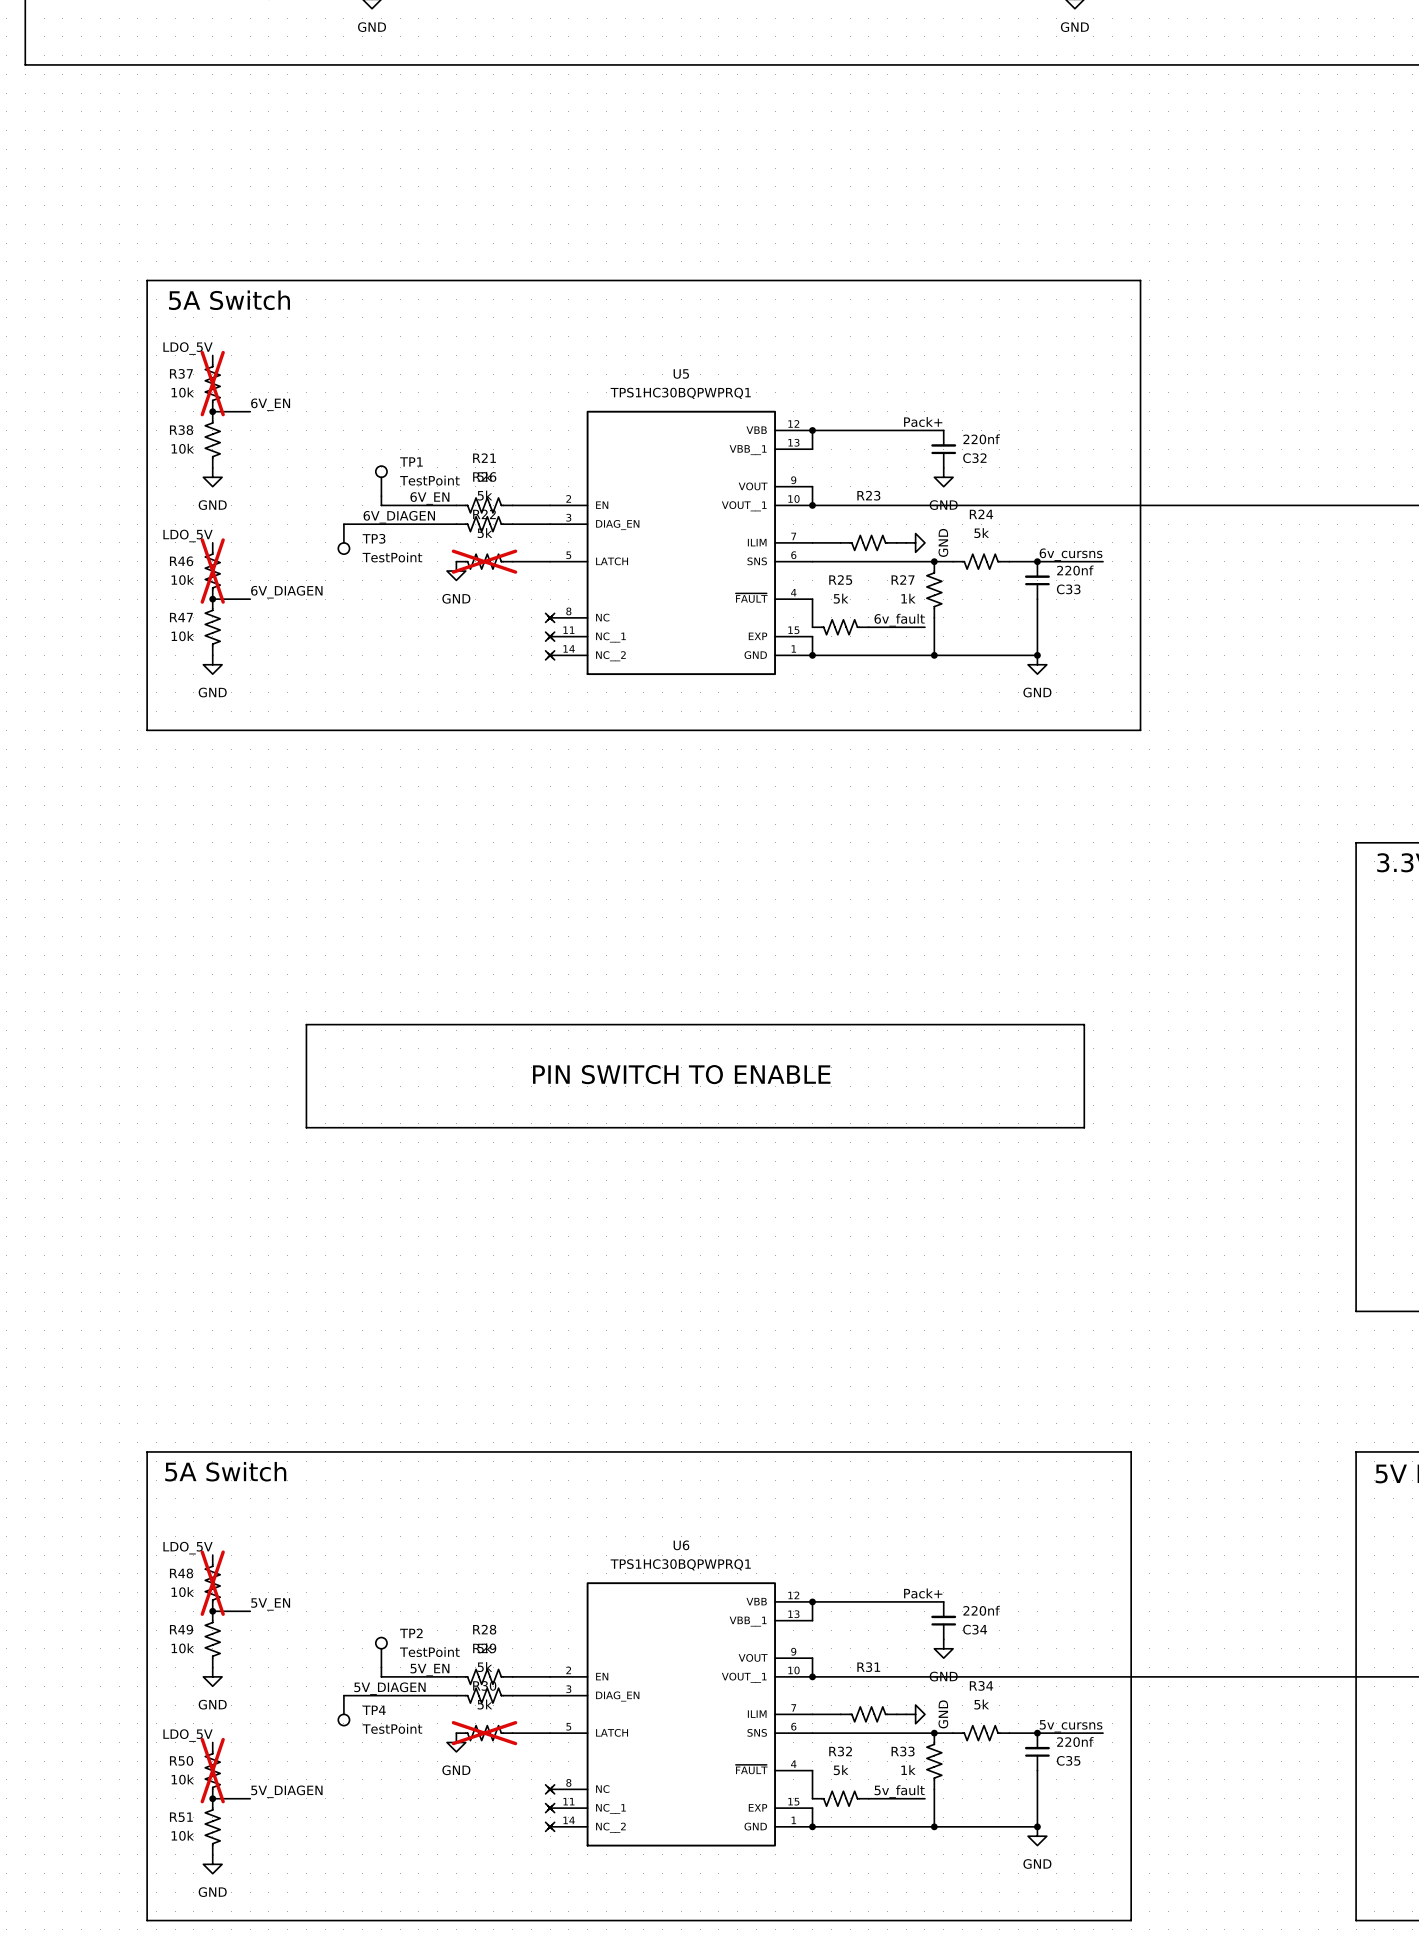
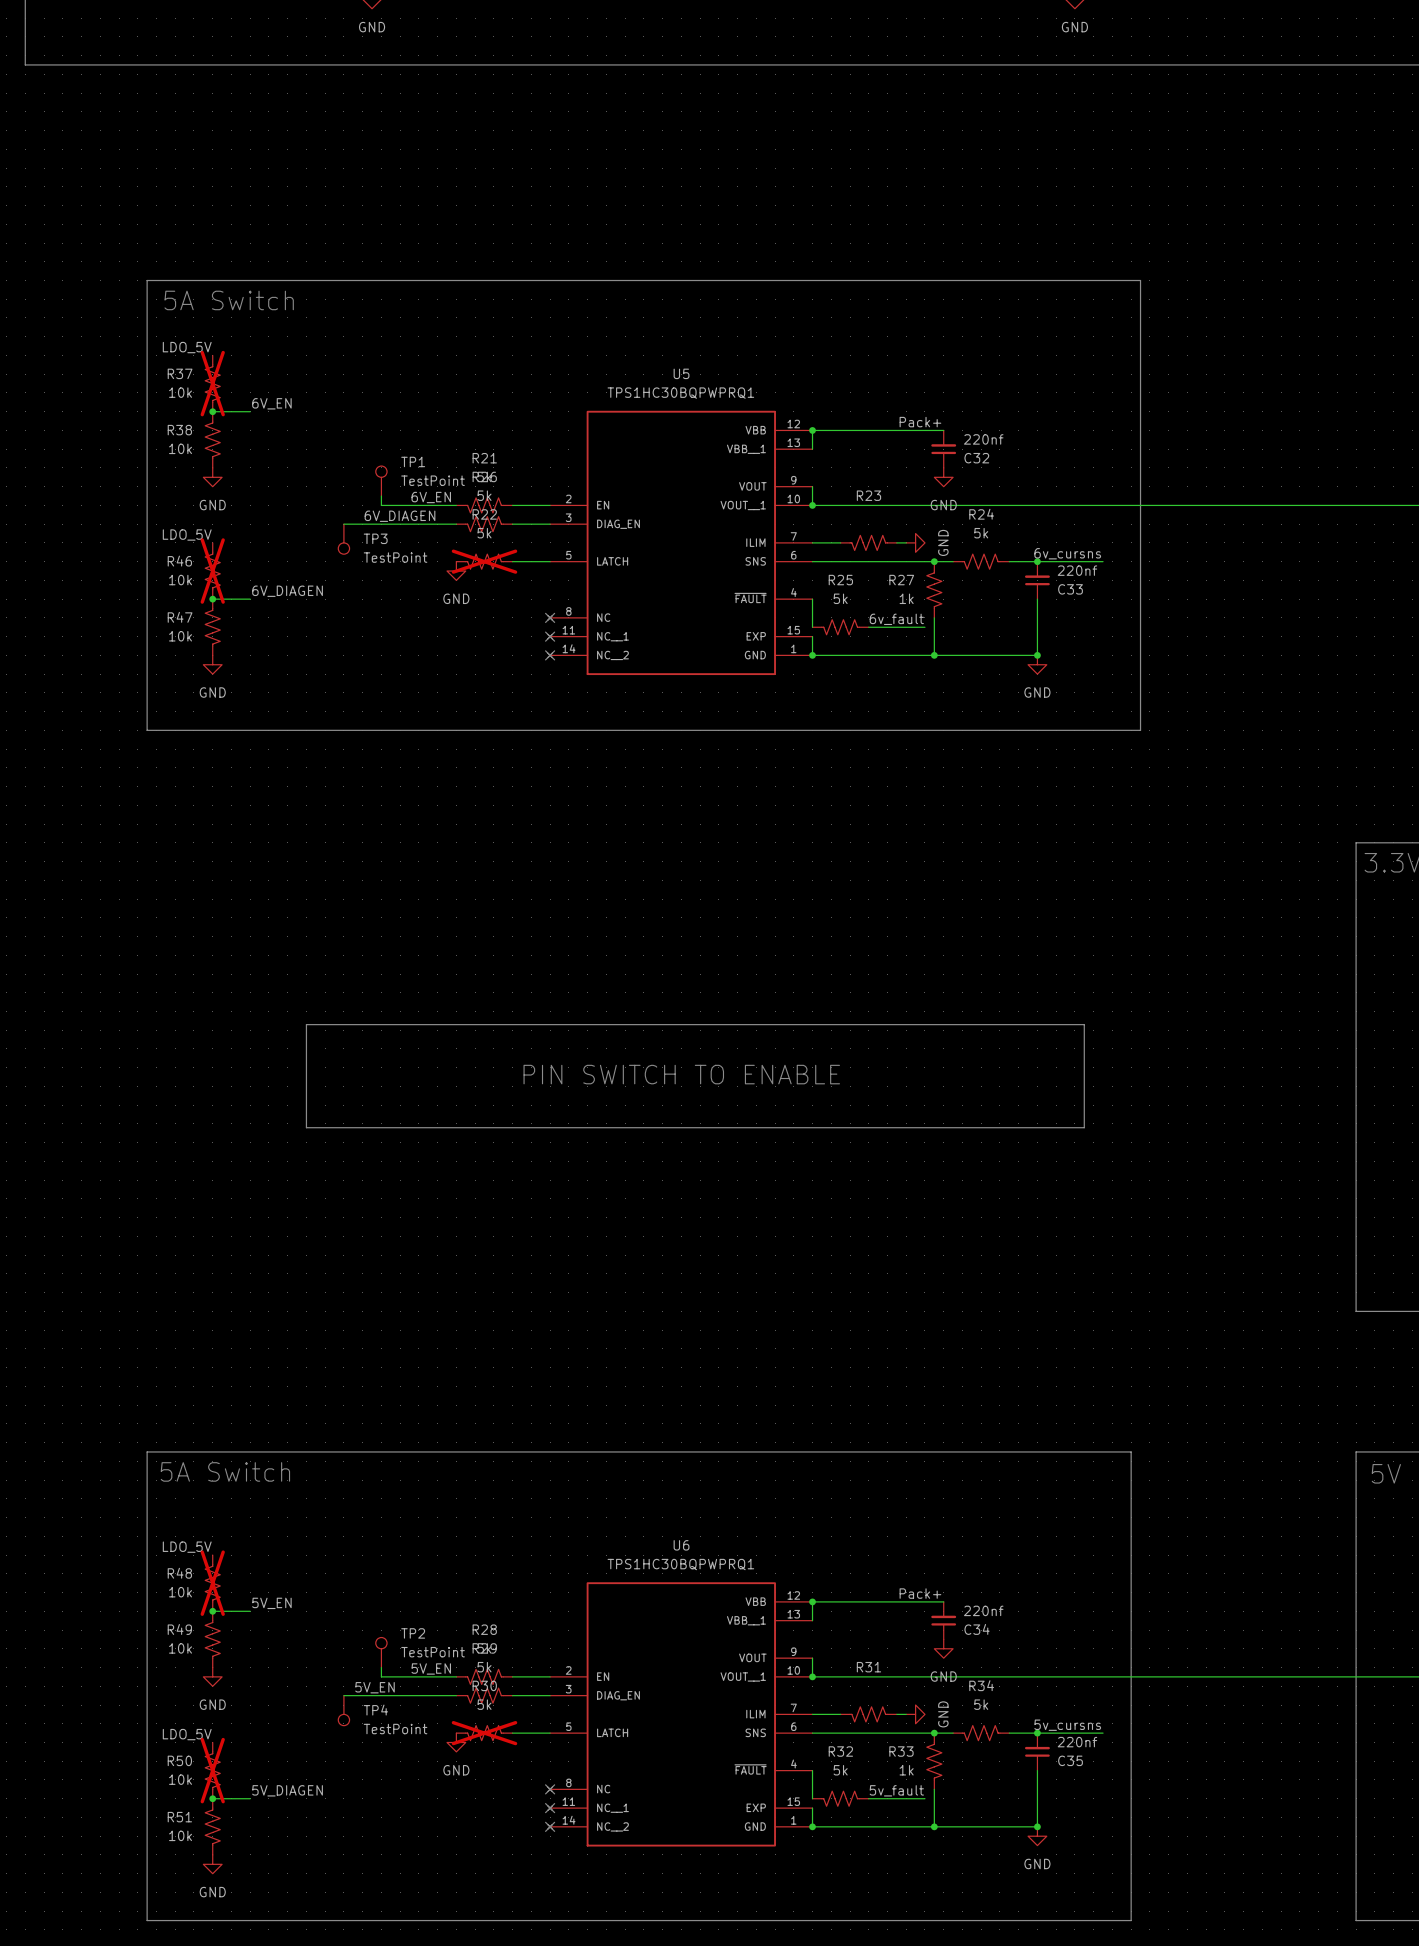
label: 5V_DIAGEN (389, 1688) -> 5V_EN (375, 1687)

